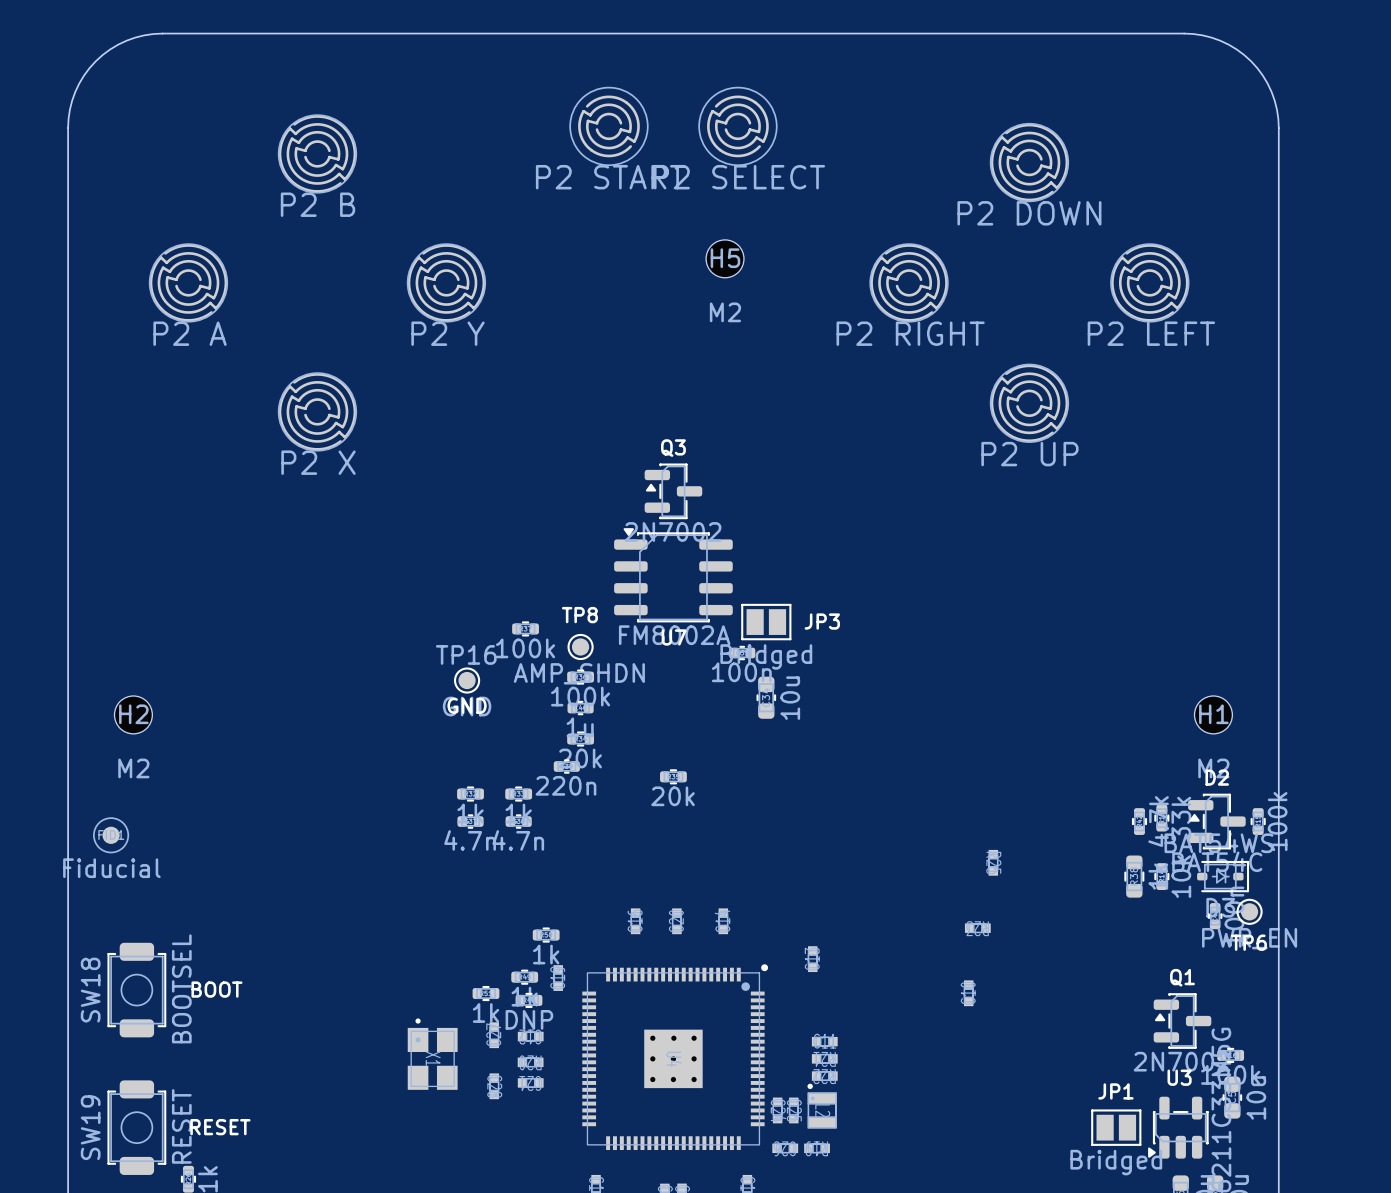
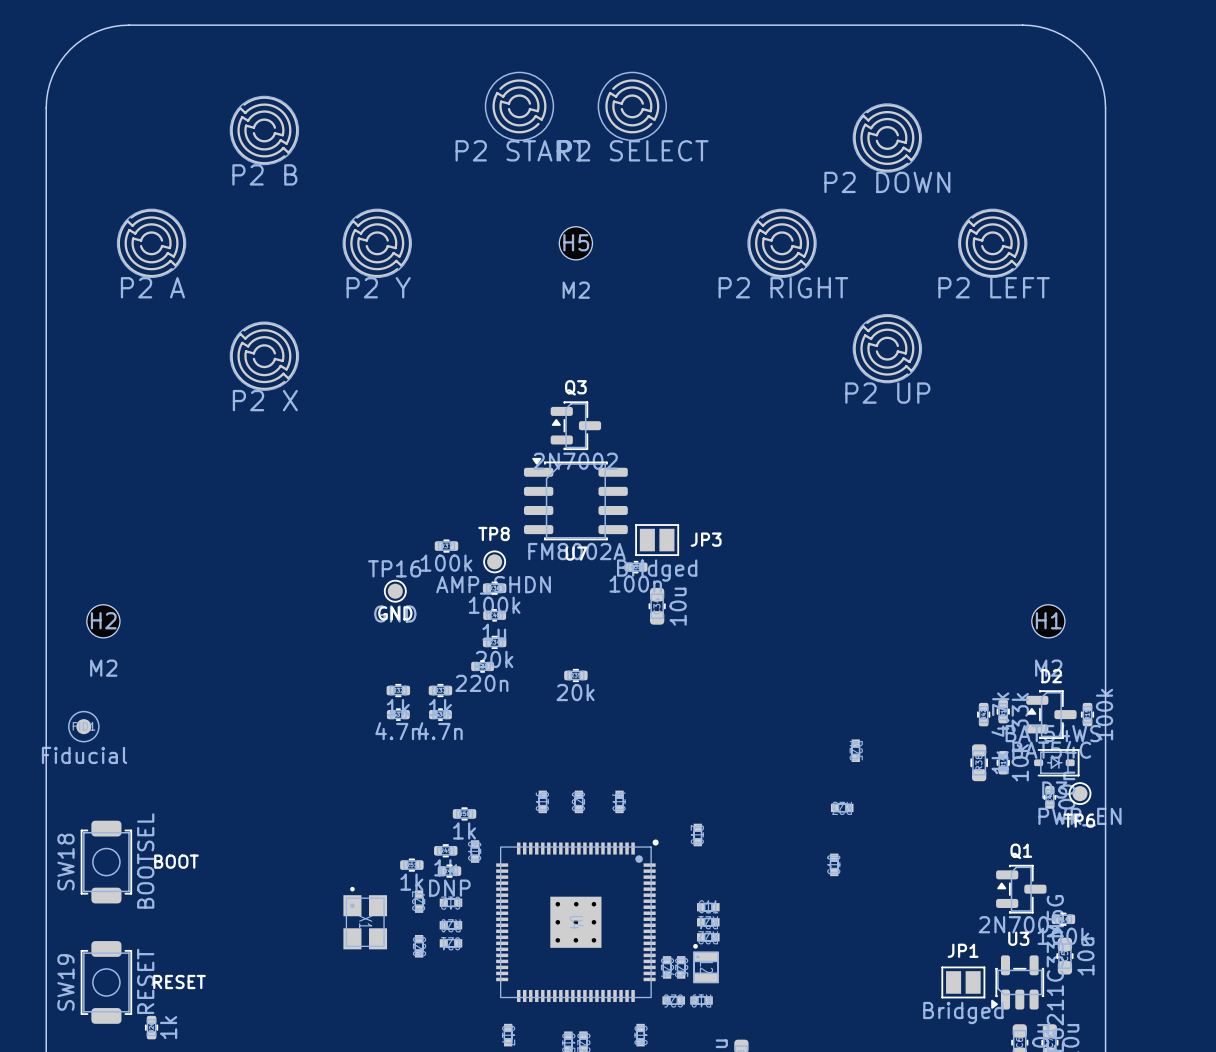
H5 position: (725, 258) -> (575, 243)

